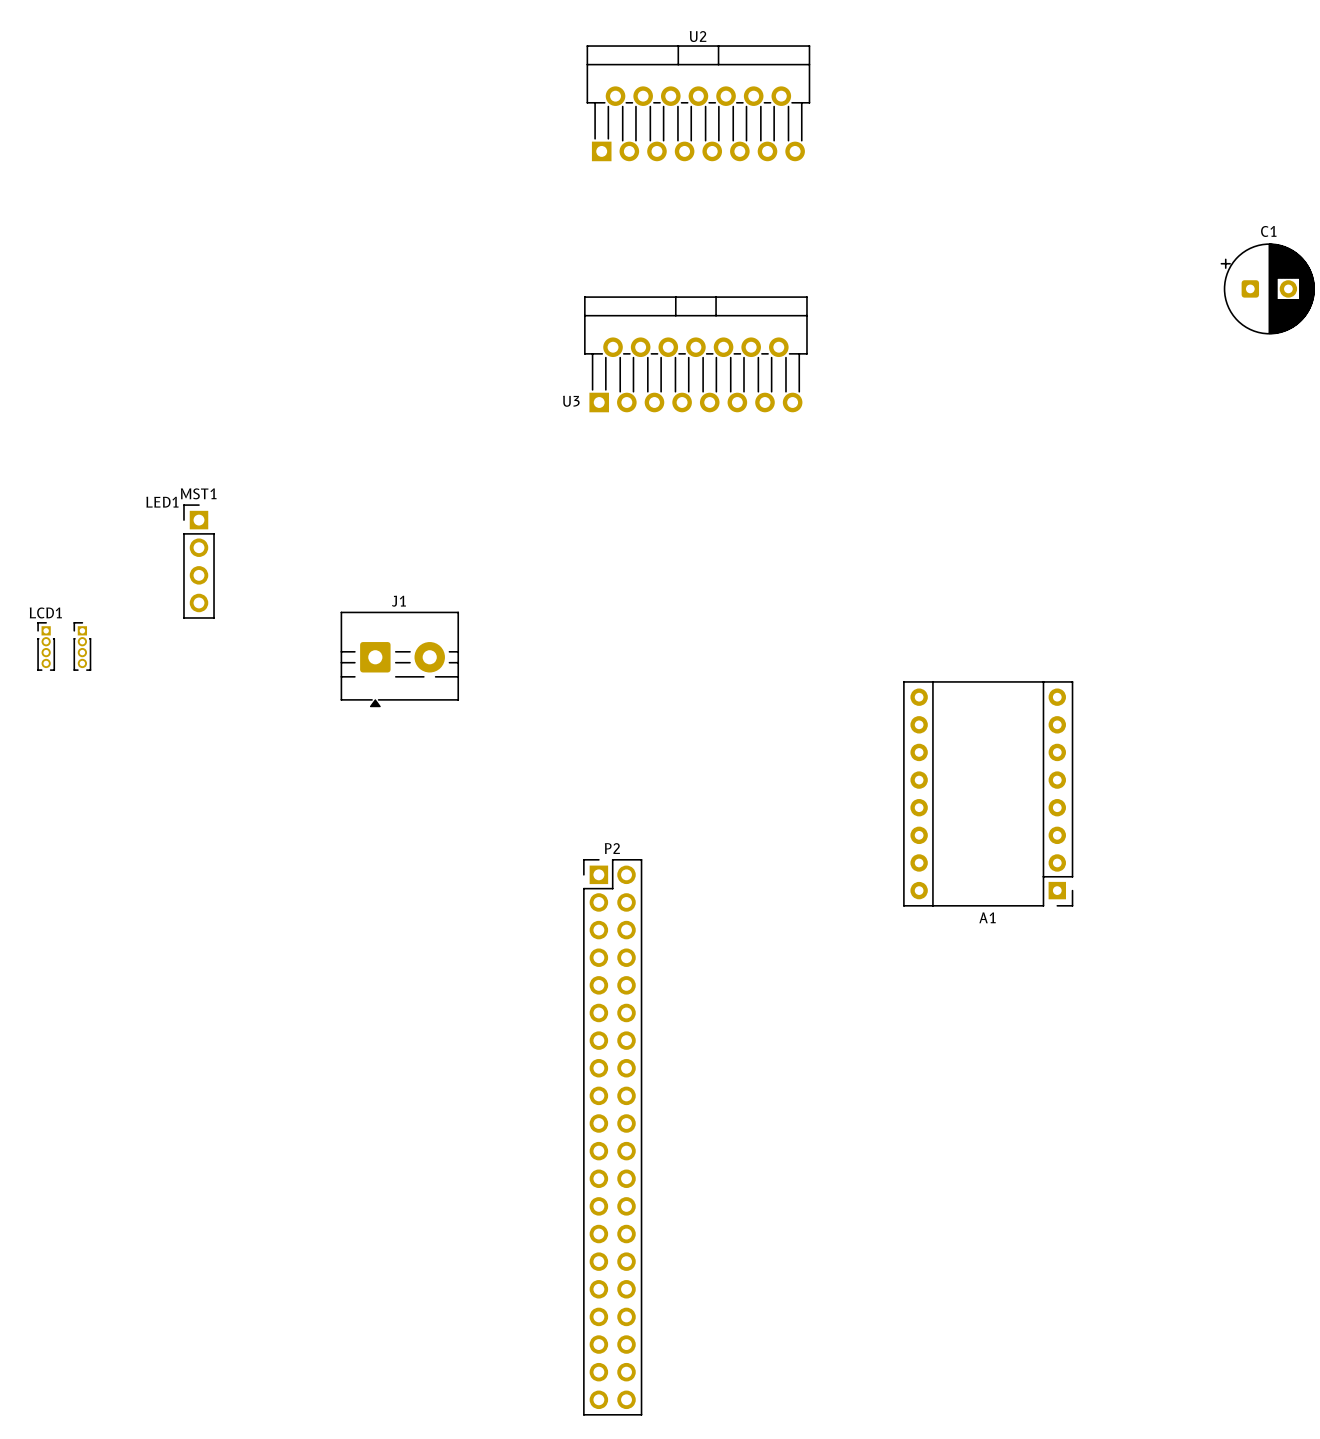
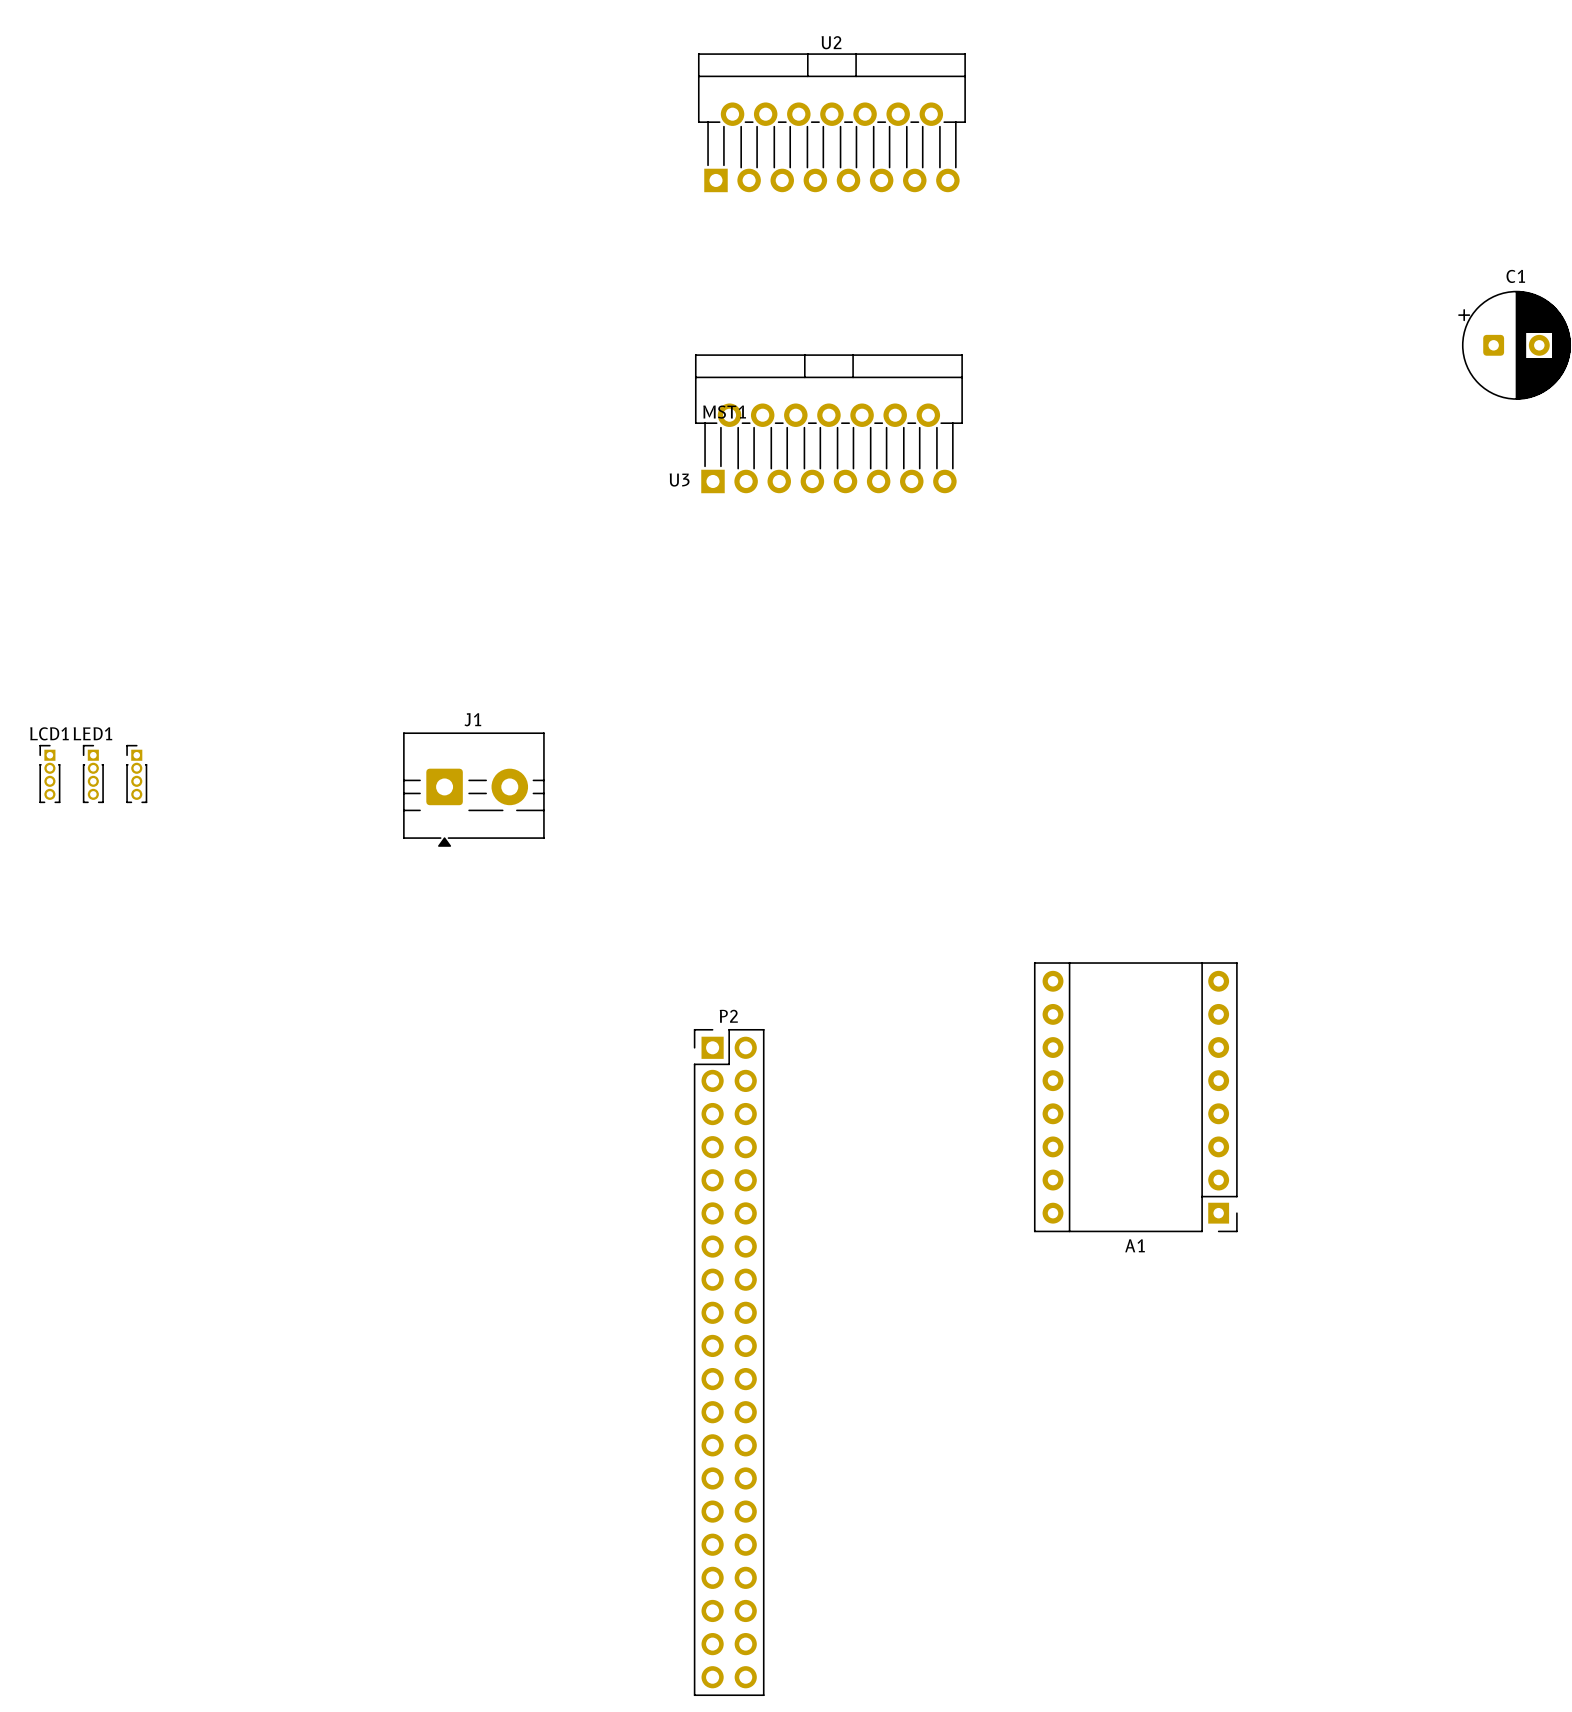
MST1 name position: MST1 (198, 493) -> MST1 (724, 412)
LED1 name position: LED1 (162, 502) -> LED1 (92, 733)
MST1 footprint: [183, 504, 215, 619] -> [126, 744, 148, 804]
A1 position: (988, 793) -> (1135, 1097)

